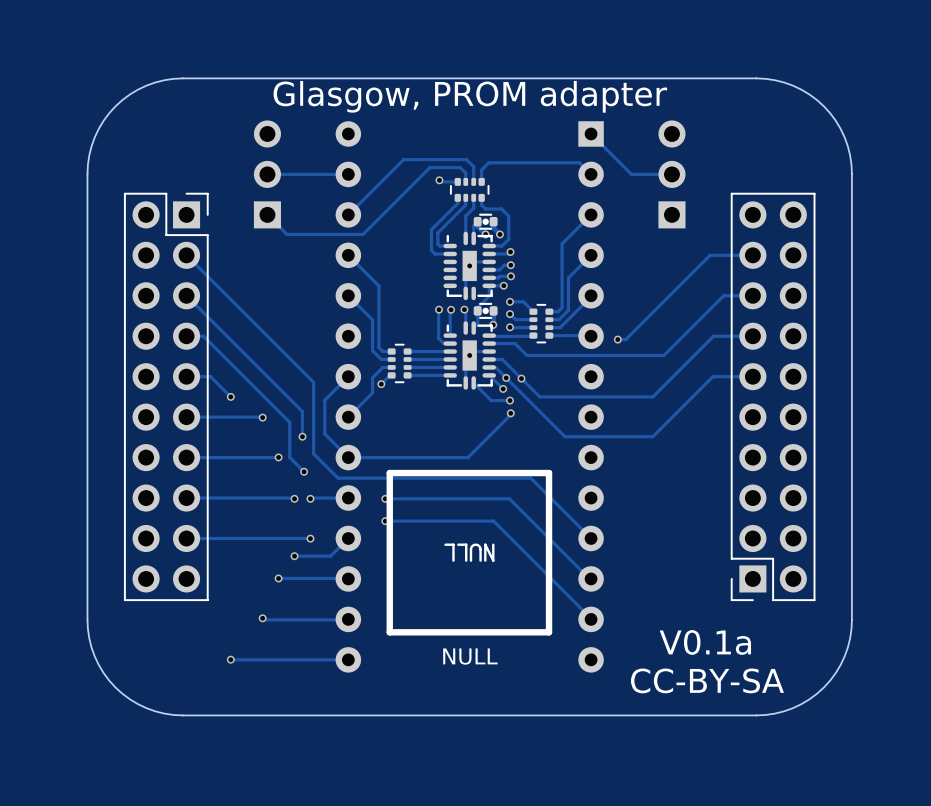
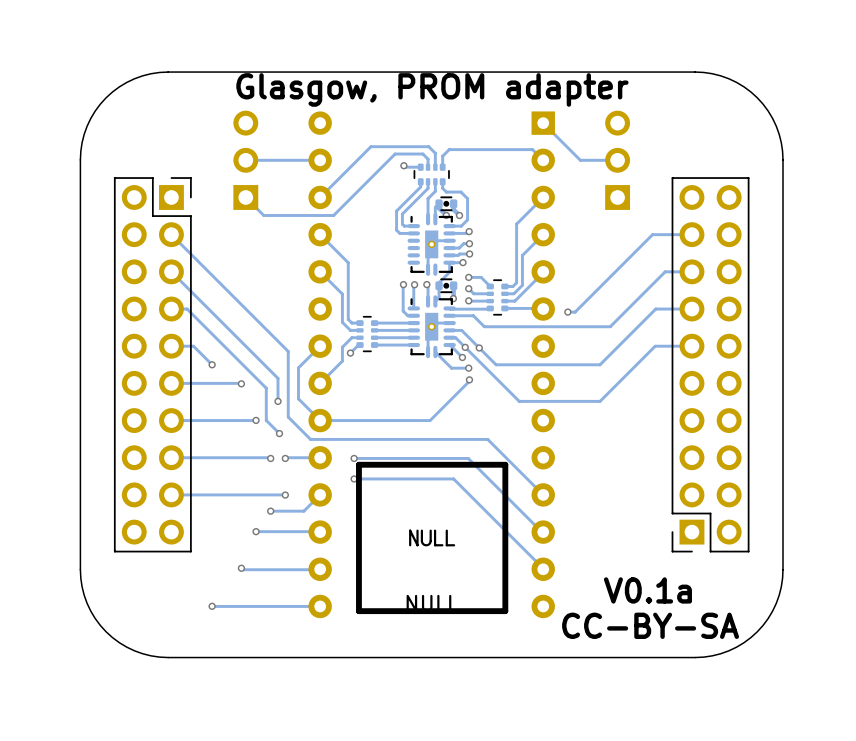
drawing: [386, 469, 553, 636] -> none
drawing: none -> [356, 461, 509, 615]

